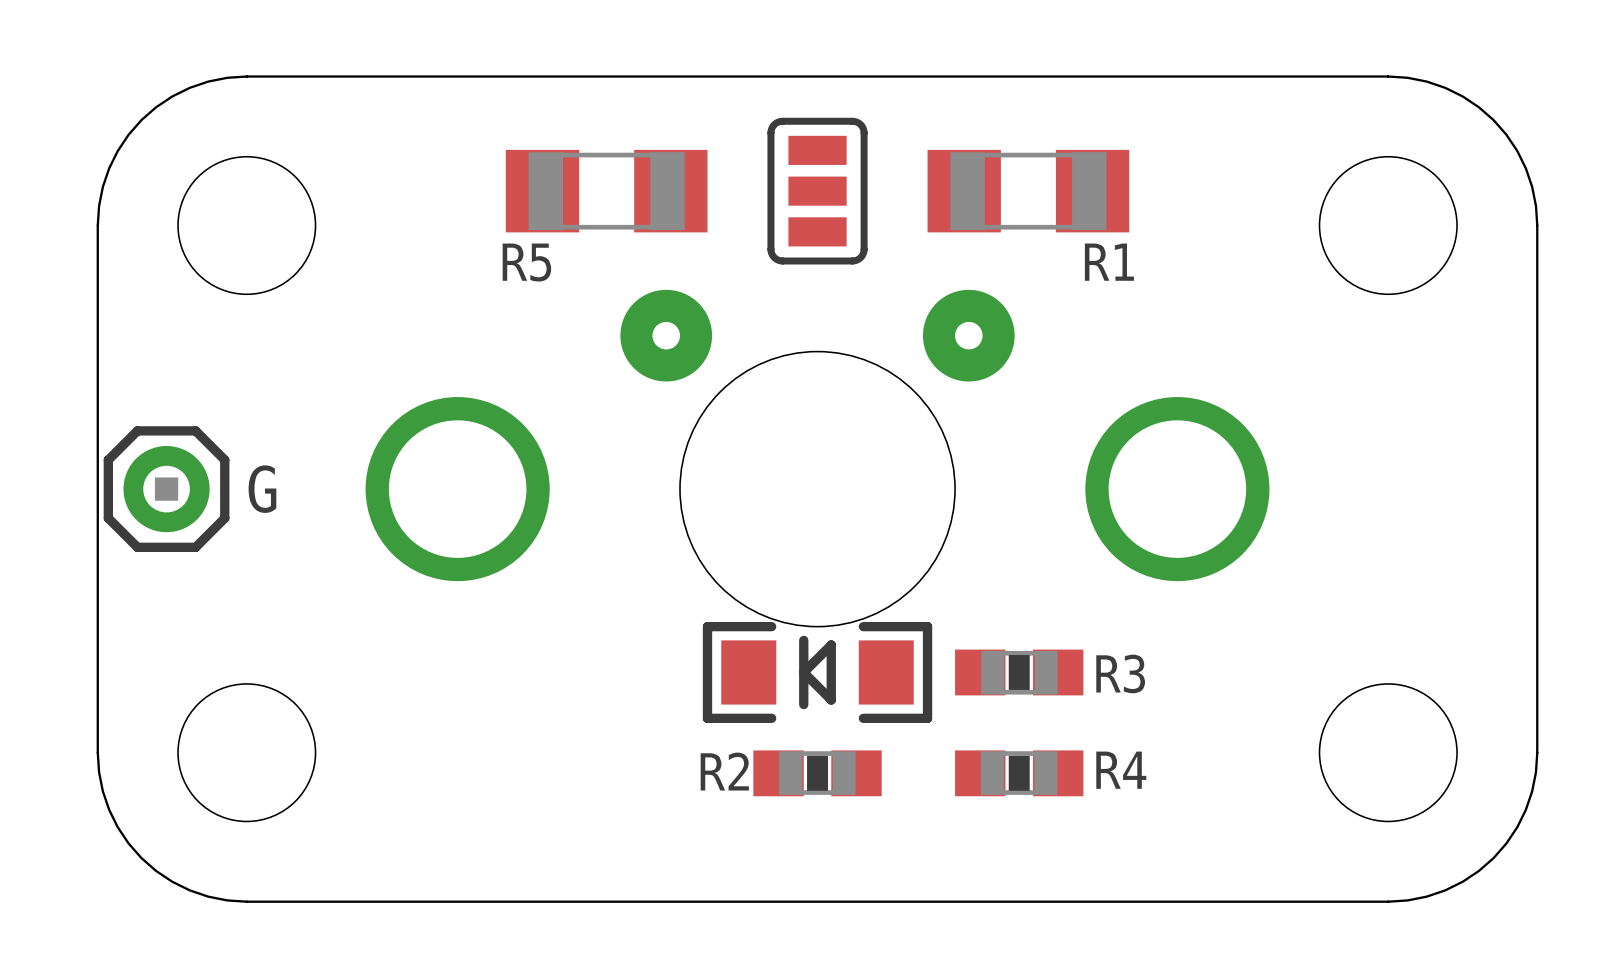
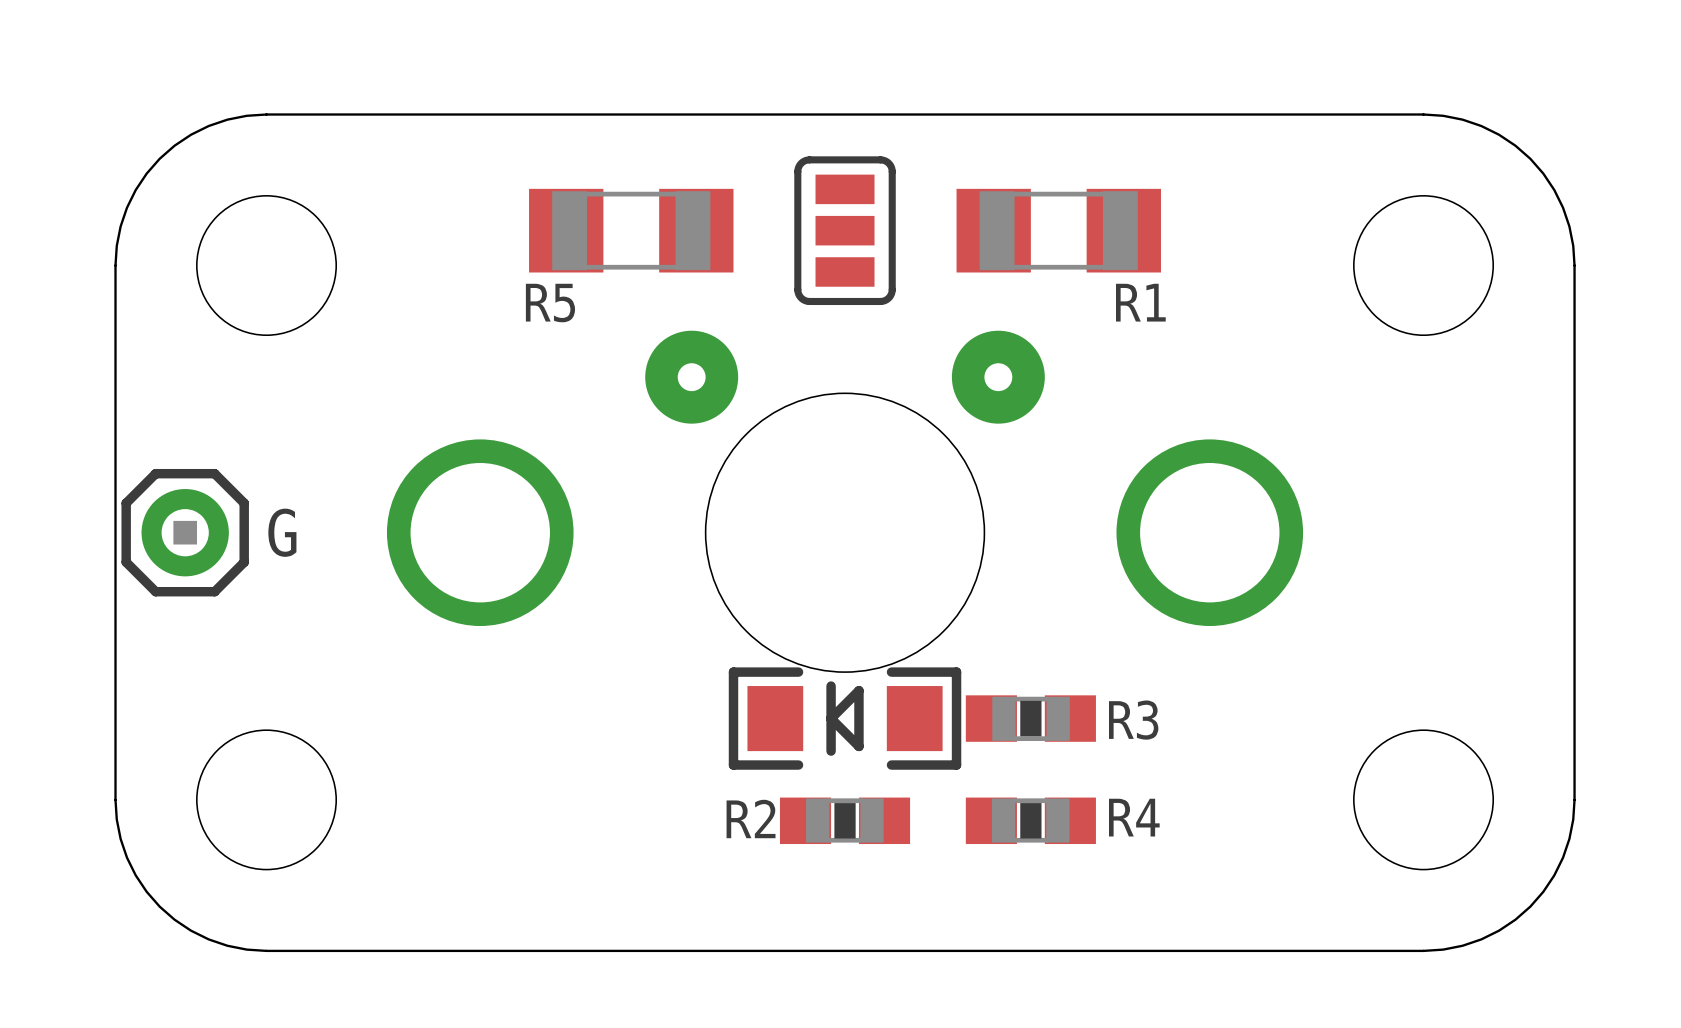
R3 position: (1019, 672) -> (1030, 718)
R4 position: (1019, 773) -> (1030, 820)

